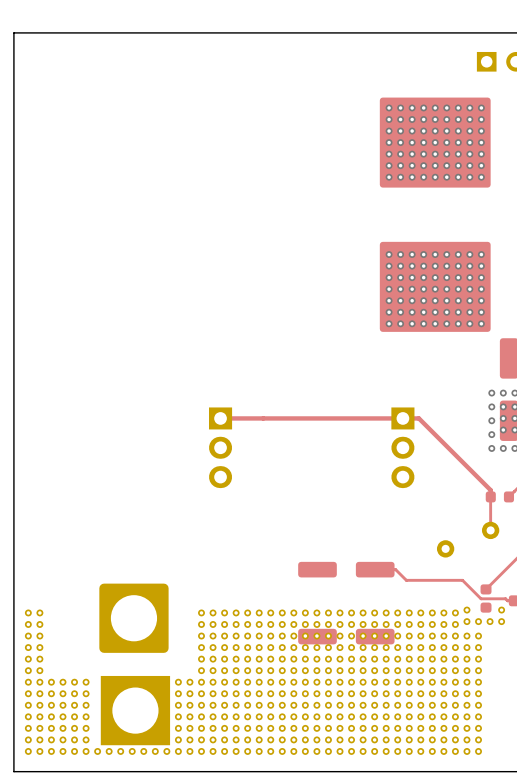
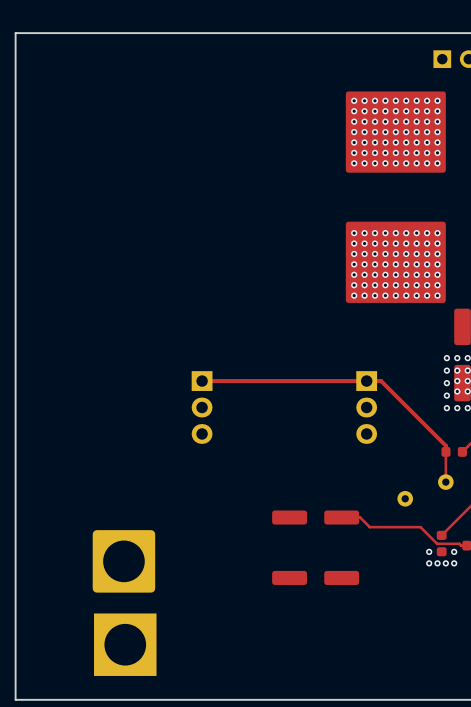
via: none -> (429, 551)
via: none -> (454, 551)
part: (466, 610) -> none
part: (501, 610) -> none
part: (28, 612) -> none
part: (39, 612) -> none
part: (201, 612) -> none
part: (213, 612) -> none
part: (224, 612) -> none
part: (236, 612) -> none
part: (247, 612) -> none
part: (259, 612) -> none
part: (270, 612) -> none
part: (282, 612) -> none
part: (293, 612) -> none
part: (305, 612) -> none
part: (316, 612) -> none
part: (328, 612) -> none
part: (340, 612) -> none
part: (351, 612) -> none
part: (363, 612) -> none
part: (374, 612) -> none
part: (386, 612) -> none
part: (397, 612) -> none
part: (409, 612) -> none
part: (420, 612) -> none
part: (432, 612) -> none
part: (443, 612) -> none
part: (455, 612) -> none
via: none -> (429, 563)
via: none -> (437, 563)
via: none -> (445, 563)
via: none -> (454, 563)
part: (466, 621) -> none
part: (478, 621) -> none
part: (490, 621) -> none
part: (501, 621) -> none
part: (28, 624) -> none
part: (39, 624) -> none
part: (201, 624) -> none
part: (213, 624) -> none
part: (224, 624) -> none
part: (236, 624) -> none
part: (247, 624) -> none
part: (259, 624) -> none
part: (270, 624) -> none
part: (282, 624) -> none
part: (293, 624) -> none
part: (305, 624) -> none
part: (316, 624) -> none
part: (328, 624) -> none
part: (340, 624) -> none
part: (351, 624) -> none
part: (363, 624) -> none
part: (374, 624) -> none
part: (386, 624) -> none
part: (397, 624) -> none
part: (409, 624) -> none
part: (420, 624) -> none
part: (432, 624) -> none
part: (443, 624) -> none
part: (455, 624) -> none
part: (28, 636) -> none
part: (39, 636) -> none
part: (201, 636) -> none
part: (213, 636) -> none
part: (224, 636) -> none
part: (236, 636) -> none
part: (247, 636) -> none
part: (259, 636) -> none
part: (270, 636) -> none
part: (282, 636) -> none
part: (293, 636) -> none
part: (305, 636) -> none
part: (316, 636) -> none
part: (328, 636) -> none
part: (340, 636) -> none
part: (351, 636) -> none
part: (363, 636) -> none
part: (374, 636) -> none
part: (386, 636) -> none
part: (397, 636) -> none
part: (409, 636) -> none
part: (420, 636) -> none
part: (432, 636) -> none
part: (443, 636) -> none
part: (455, 636) -> none
part: (466, 636) -> none
part: (478, 636) -> none
part: (28, 647) -> none
part: (39, 647) -> none
part: (201, 647) -> none
part: (213, 647) -> none
part: (224, 647) -> none
part: (236, 647) -> none
part: (247, 647) -> none
part: (259, 647) -> none
part: (270, 647) -> none
part: (282, 647) -> none
part: (293, 647) -> none
part: (305, 647) -> none
part: (316, 647) -> none
part: (328, 647) -> none
part: (340, 647) -> none
part: (351, 647) -> none
part: (363, 647) -> none
part: (374, 647) -> none
part: (386, 647) -> none
part: (397, 647) -> none
part: (409, 647) -> none
part: (420, 647) -> none
part: (432, 647) -> none
part: (443, 647) -> none
part: (455, 647) -> none
part: (466, 647) -> none
part: (478, 647) -> none
part: (28, 659) -> none
part: (39, 659) -> none
part: (201, 659) -> none
part: (213, 659) -> none
part: (224, 659) -> none
part: (236, 659) -> none
part: (247, 659) -> none
part: (259, 659) -> none
part: (270, 659) -> none
part: (282, 659) -> none
part: (293, 659) -> none
part: (305, 659) -> none
part: (316, 659) -> none
part: (328, 659) -> none
part: (340, 659) -> none
part: (351, 659) -> none
part: (363, 659) -> none
part: (374, 659) -> none
part: (386, 659) -> none
part: (397, 659) -> none
part: (409, 659) -> none
part: (420, 659) -> none
part: (432, 659) -> none
part: (443, 659) -> none
part: (455, 659) -> none
part: (466, 659) -> none
part: (478, 659) -> none
part: (28, 670) -> none
part: (39, 670) -> none
part: (201, 670) -> none
part: (213, 670) -> none
part: (224, 670) -> none
part: (236, 670) -> none
part: (247, 670) -> none
part: (259, 670) -> none
part: (270, 670) -> none
part: (282, 670) -> none
part: (293, 670) -> none
part: (305, 670) -> none
part: (316, 670) -> none
part: (328, 670) -> none
part: (340, 670) -> none
part: (351, 670) -> none
part: (363, 670) -> none
part: (374, 670) -> none
part: (386, 670) -> none
part: (397, 670) -> none
part: (409, 670) -> none
part: (420, 670) -> none
part: (432, 670) -> none
part: (443, 670) -> none
part: (455, 670) -> none
part: (466, 670) -> none
part: (478, 670) -> none
part: (28, 682) -> none
part: (39, 682) -> none
part: (51, 682) -> none
part: (62, 682) -> none
part: (74, 682) -> none
part: (86, 682) -> none
part: (178, 682) -> none
part: (189, 682) -> none
part: (201, 682) -> none
part: (213, 682) -> none
part: (224, 682) -> none
part: (236, 682) -> none
part: (247, 682) -> none
part: (259, 682) -> none
part: (270, 682) -> none
part: (282, 682) -> none
part: (293, 682) -> none
part: (305, 682) -> none
part: (316, 682) -> none
part: (328, 682) -> none
part: (340, 682) -> none
part: (351, 682) -> none
part: (363, 682) -> none
part: (374, 682) -> none
part: (386, 682) -> none
part: (397, 682) -> none
part: (409, 682) -> none
part: (420, 682) -> none
part: (432, 682) -> none
part: (443, 682) -> none
part: (455, 682) -> none
part: (466, 682) -> none
part: (478, 682) -> none
part: (28, 693) -> none
part: (39, 693) -> none
part: (51, 693) -> none
part: (62, 693) -> none
part: (74, 693) -> none
part: (86, 693) -> none
part: (178, 693) -> none
part: (189, 693) -> none
part: (201, 693) -> none
part: (213, 693) -> none
part: (224, 693) -> none
part: (236, 693) -> none
part: (247, 693) -> none
part: (259, 693) -> none
part: (270, 693) -> none
part: (282, 693) -> none
part: (293, 693) -> none
part: (305, 693) -> none
part: (316, 693) -> none
part: (328, 693) -> none
part: (340, 693) -> none
part: (351, 693) -> none
part: (363, 693) -> none
part: (374, 693) -> none
part: (386, 693) -> none
part: (397, 693) -> none
part: (409, 693) -> none
part: (420, 693) -> none
part: (432, 693) -> none
part: (443, 693) -> none
part: (455, 693) -> none
part: (466, 693) -> none
part: (478, 693) -> none
part: (28, 705) -> none
part: (39, 705) -> none
part: (51, 705) -> none
part: (62, 705) -> none
part: (74, 705) -> none
part: (86, 705) -> none
part: (178, 705) -> none
part: (189, 705) -> none
part: (201, 705) -> none
part: (213, 705) -> none
part: (224, 705) -> none
part: (236, 705) -> none
part: (247, 705) -> none
part: (259, 705) -> none
part: (270, 705) -> none
part: (282, 705) -> none
part: (293, 705) -> none
part: (305, 705) -> none
part: (316, 705) -> none
part: (328, 705) -> none
part: (340, 705) -> none
part: (351, 705) -> none
part: (363, 705) -> none
part: (374, 705) -> none
part: (386, 705) -> none
part: (397, 705) -> none
part: (409, 705) -> none
part: (420, 705) -> none
part: (432, 705) -> none
part: (443, 705) -> none
part: (455, 705) -> none
part: (466, 705) -> none
part: (478, 705) -> none
part: (28, 716) -> none
part: (39, 716) -> none
part: (51, 716) -> none
part: (62, 716) -> none
part: (74, 716) -> none
part: (86, 716) -> none
part: (178, 716) -> none
part: (189, 716) -> none
part: (201, 716) -> none
part: (213, 716) -> none
part: (224, 716) -> none
part: (236, 716) -> none
part: (247, 716) -> none
part: (259, 716) -> none
part: (270, 716) -> none
part: (282, 716) -> none
part: (293, 716) -> none
part: (305, 716) -> none
part: (316, 716) -> none
part: (328, 716) -> none
part: (340, 716) -> none
part: (351, 716) -> none
part: (363, 716) -> none
part: (374, 716) -> none
part: (386, 716) -> none
part: (397, 716) -> none
part: (409, 716) -> none
part: (420, 716) -> none
part: (432, 716) -> none
part: (443, 716) -> none
part: (455, 716) -> none
part: (466, 716) -> none
part: (478, 716) -> none
part: (28, 728) -> none
part: (39, 728) -> none
part: (51, 728) -> none
part: (62, 728) -> none
part: (74, 728) -> none
part: (86, 728) -> none
part: (178, 728) -> none
part: (189, 728) -> none
part: (201, 728) -> none
part: (213, 728) -> none
part: (224, 728) -> none
part: (236, 728) -> none
part: (247, 728) -> none
part: (259, 728) -> none
part: (270, 728) -> none
part: (282, 728) -> none
part: (293, 728) -> none
part: (305, 728) -> none
part: (316, 728) -> none
part: (328, 728) -> none
part: (340, 728) -> none
part: (351, 728) -> none
part: (363, 728) -> none
part: (374, 728) -> none
part: (386, 728) -> none
part: (397, 728) -> none
part: (409, 728) -> none
part: (420, 728) -> none
part: (432, 728) -> none
part: (443, 728) -> none
part: (455, 728) -> none
part: (466, 728) -> none
part: (478, 728) -> none
part: (28, 739) -> none
part: (39, 739) -> none
part: (51, 739) -> none
part: (62, 739) -> none
part: (74, 739) -> none
part: (86, 739) -> none
part: (178, 739) -> none
part: (189, 739) -> none
part: (201, 739) -> none
part: (213, 739) -> none
part: (224, 739) -> none
part: (236, 739) -> none
part: (247, 739) -> none
part: (259, 739) -> none
part: (270, 739) -> none
part: (282, 739) -> none
part: (293, 739) -> none
part: (305, 739) -> none
part: (316, 739) -> none
part: (328, 739) -> none
part: (340, 739) -> none
part: (351, 739) -> none
part: (363, 739) -> none
part: (374, 739) -> none
part: (386, 739) -> none
part: (397, 739) -> none
part: (409, 739) -> none
part: (420, 739) -> none
part: (432, 739) -> none
part: (443, 739) -> none
part: (455, 739) -> none
part: (466, 739) -> none
part: (478, 739) -> none
part: (28, 751) -> none
part: (39, 751) -> none
part: (51, 751) -> none
part: (62, 751) -> none
part: (74, 751) -> none
part: (86, 751) -> none
part: (97, 751) -> none
part: (109, 751) -> none
part: (120, 751) -> none
part: (132, 751) -> none
part: (143, 751) -> none
part: (155, 751) -> none
part: (166, 751) -> none
part: (178, 751) -> none
part: (189, 751) -> none
part: (201, 751) -> none
part: (213, 751) -> none
part: (224, 751) -> none
part: (236, 751) -> none
part: (247, 751) -> none
part: (259, 751) -> none
part: (270, 751) -> none
part: (282, 751) -> none
part: (293, 751) -> none
part: (305, 751) -> none
part: (316, 751) -> none
part: (328, 751) -> none
part: (340, 751) -> none
part: (351, 751) -> none
part: (363, 751) -> none
part: (374, 751) -> none
part: (386, 751) -> none
part: (397, 751) -> none
part: (409, 751) -> none
part: (420, 751) -> none
part: (432, 751) -> none
part: (443, 751) -> none
part: (455, 751) -> none
part: (466, 751) -> none
part: (478, 751) -> none

